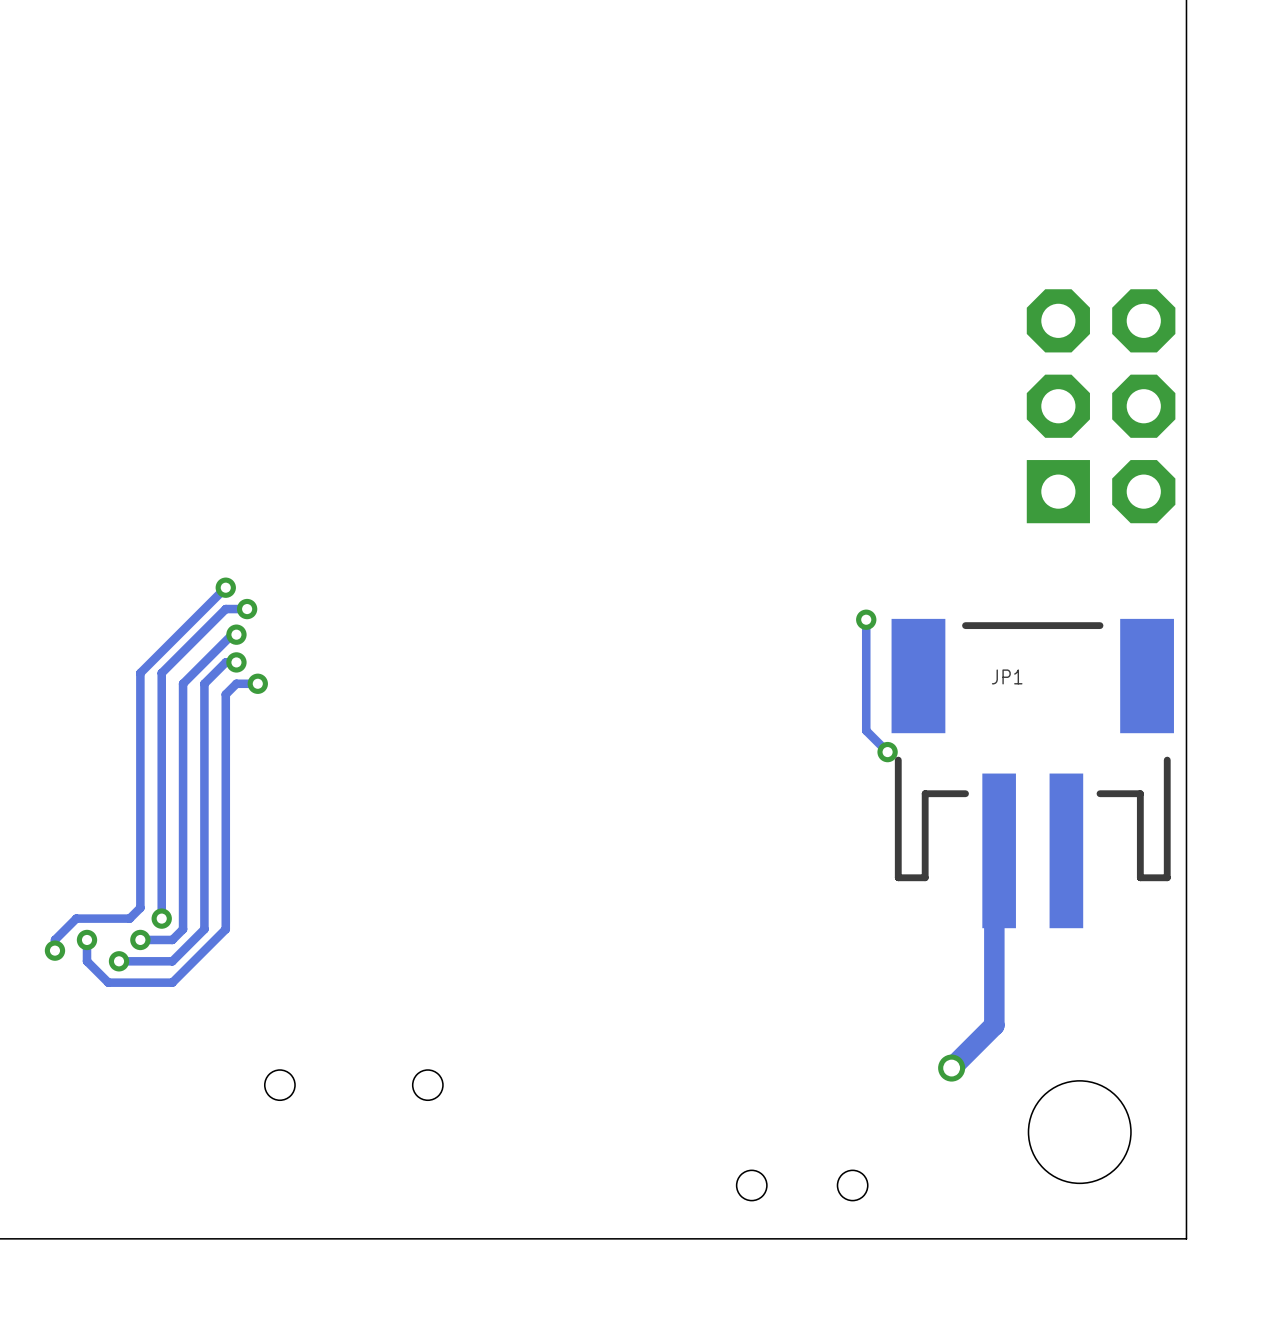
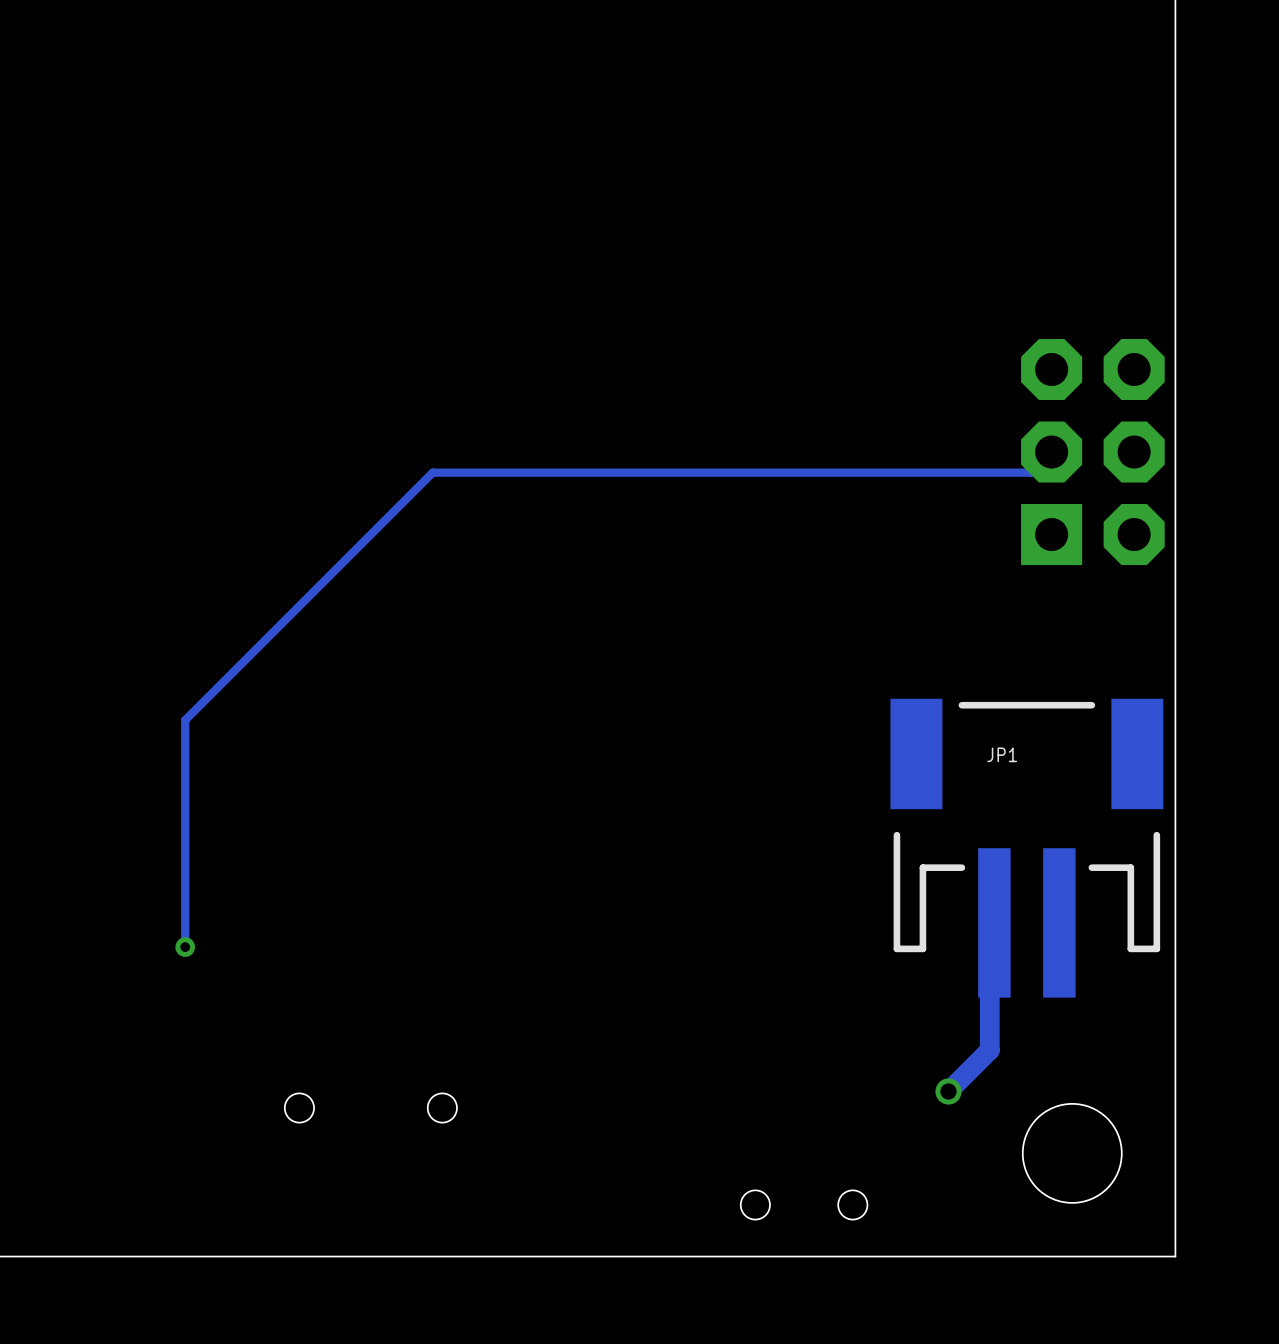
track: (225, 587) (140, 673) (140, 907) (129, 918) (76, 918) (54, 939) (54, 950) -> none
via: (225, 587) -> none
track: (247, 609) (225, 609) (161, 673) (161, 683) -> (1051, 452) (1031, 472) (432, 472) (185, 720)
via: (247, 609) -> none
track: (866, 619) (866, 730) (887, 752) -> none
via: (866, 619) -> none
track: (236, 634) (232, 634) (183, 683) (183, 929) (172, 939) (140, 939) -> none
via: (236, 634) -> none
track: (236, 662) (225, 662) (204, 683) (204, 929) (172, 961) (119, 961) -> none
via: (236, 662) -> none
track: (257, 683) (236, 683) (225, 694) (225, 929) (172, 982) (108, 982) (87, 961) (87, 939) -> none
via: (257, 683) -> none
via: (887, 752) -> none
JP1 position: (1032, 773) -> (1026, 848)
via: (87, 939) -> none
via: (140, 939) -> none
via: (54, 950) -> none
via: (119, 961) -> none

